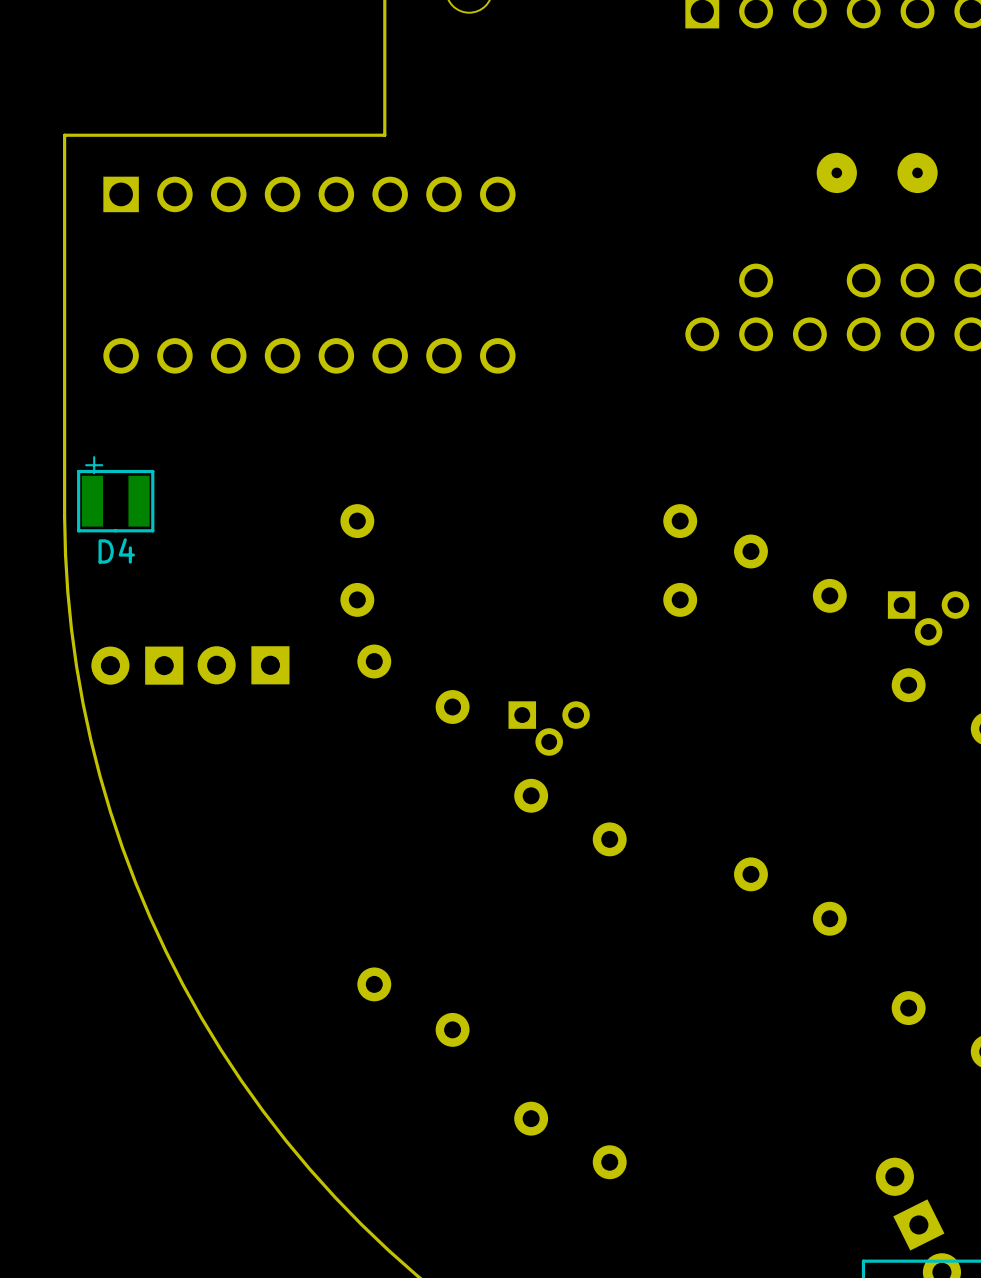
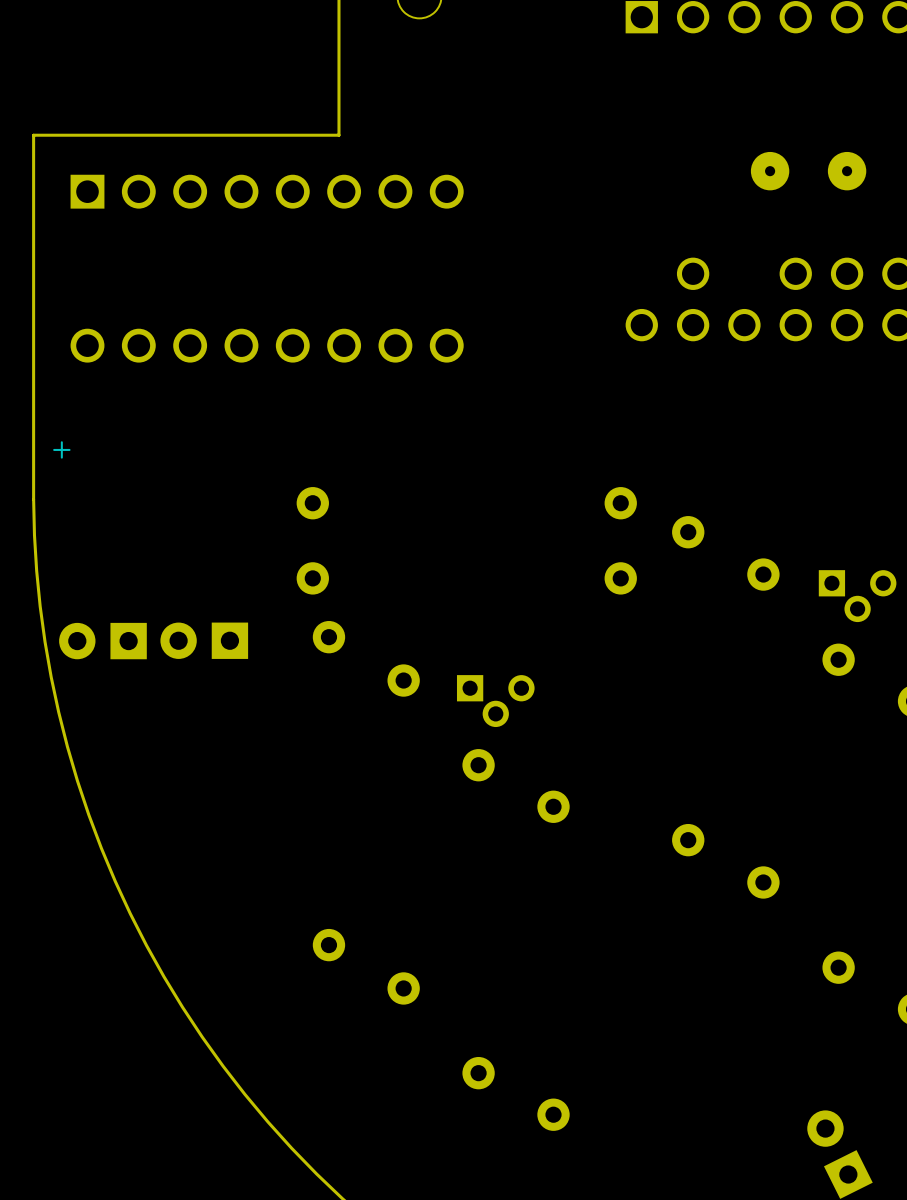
D4: (115, 501) -> none

